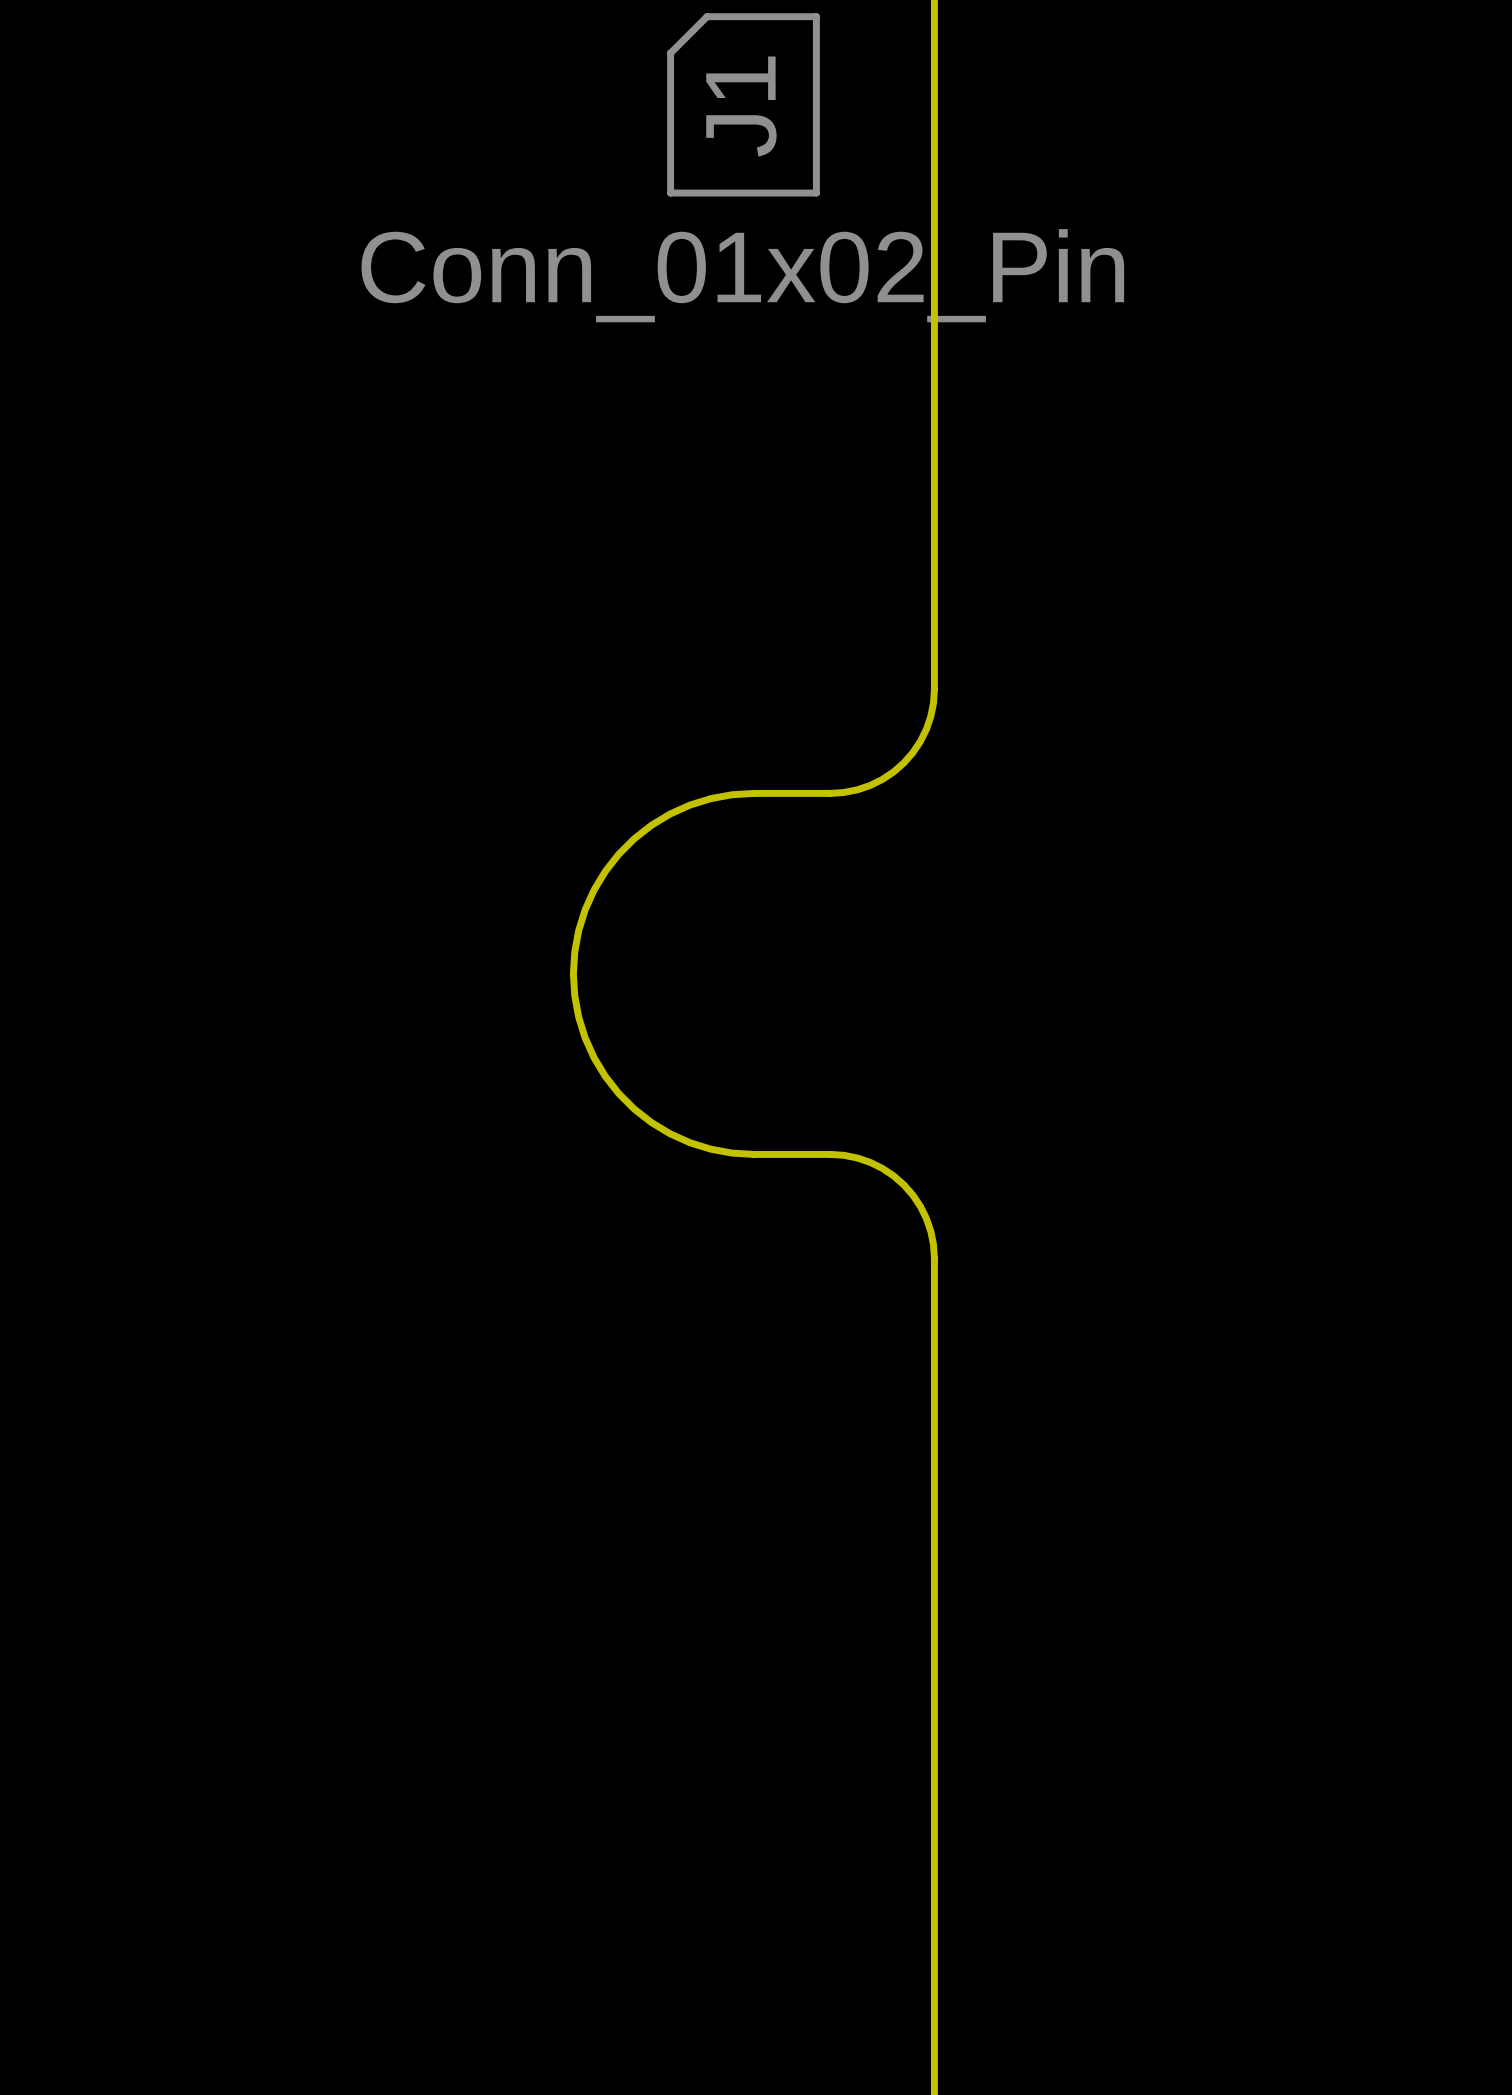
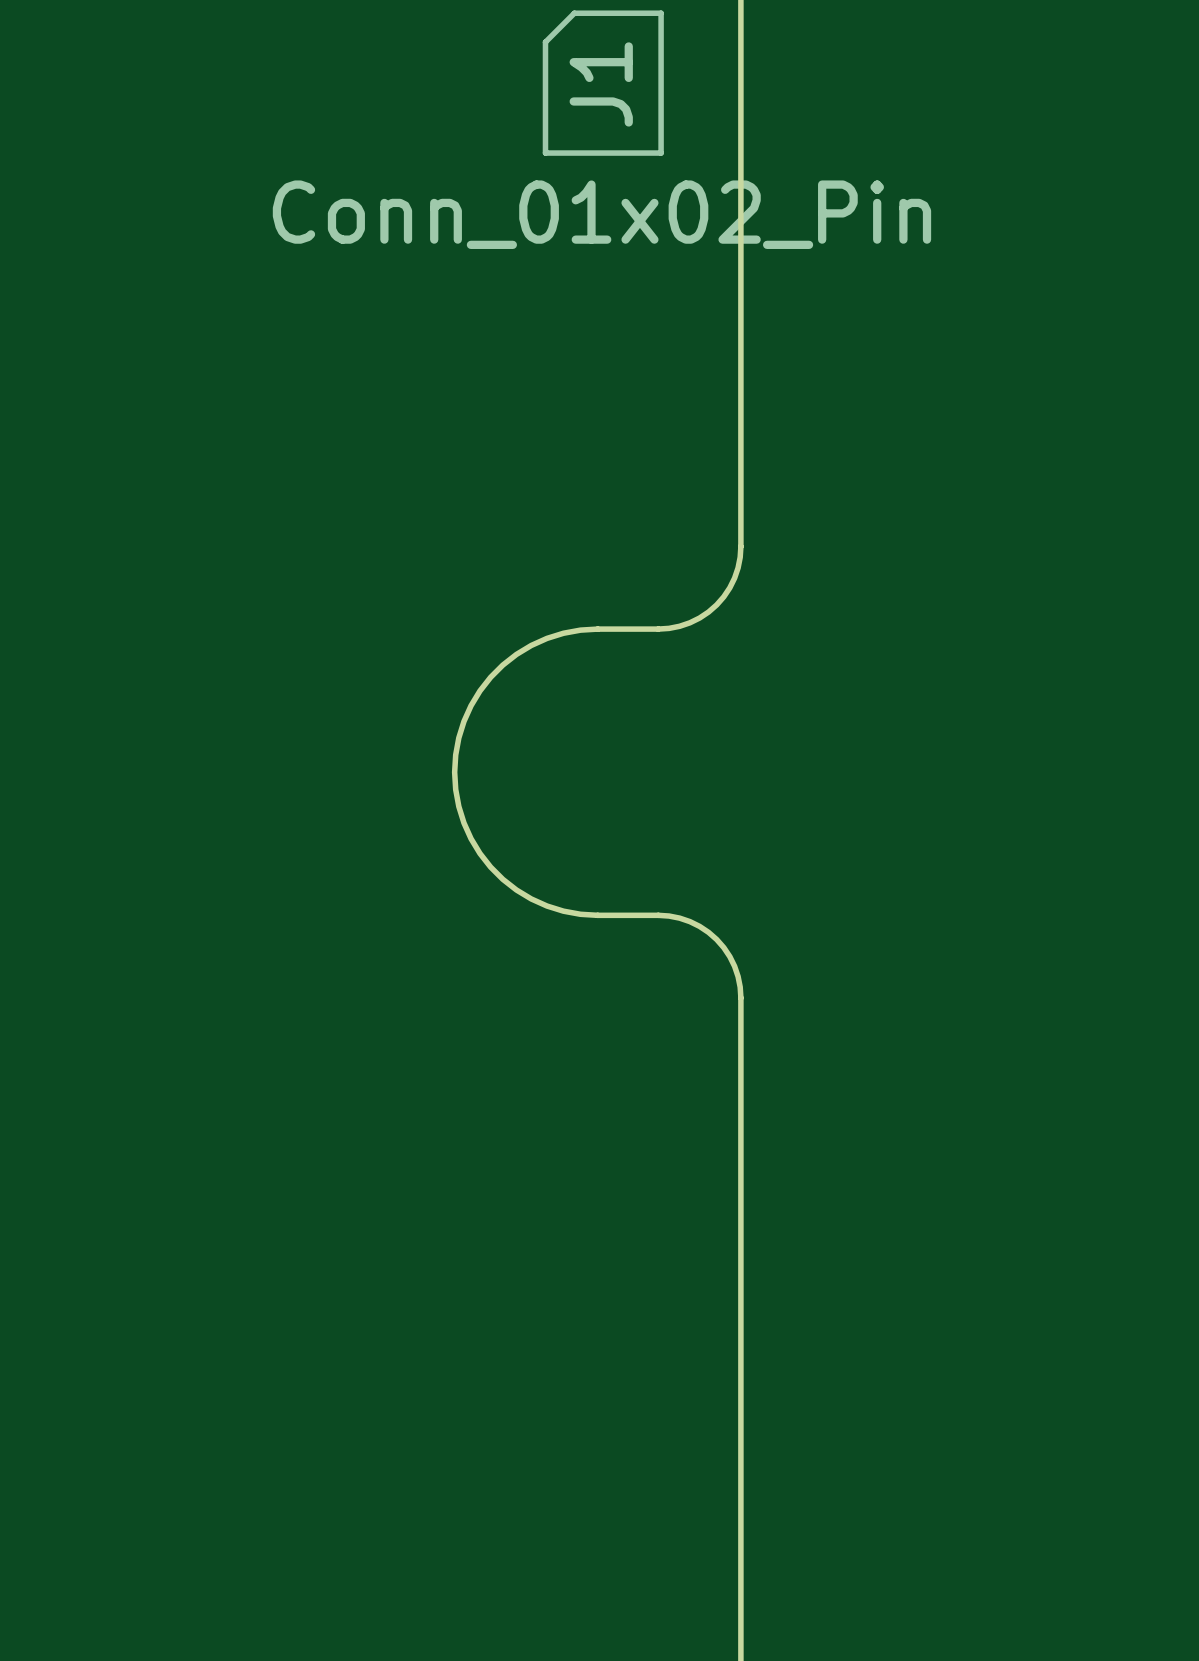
J1 position: (743, 104) -> (603, 83)

